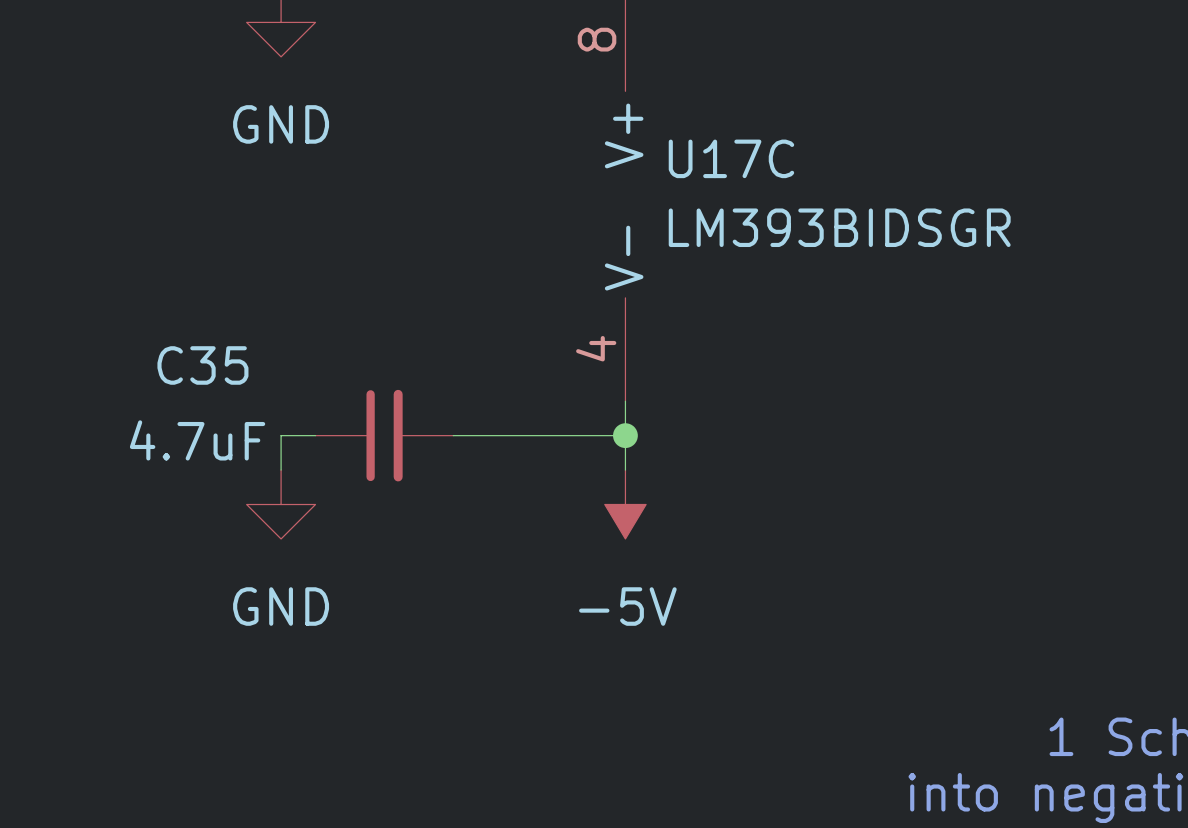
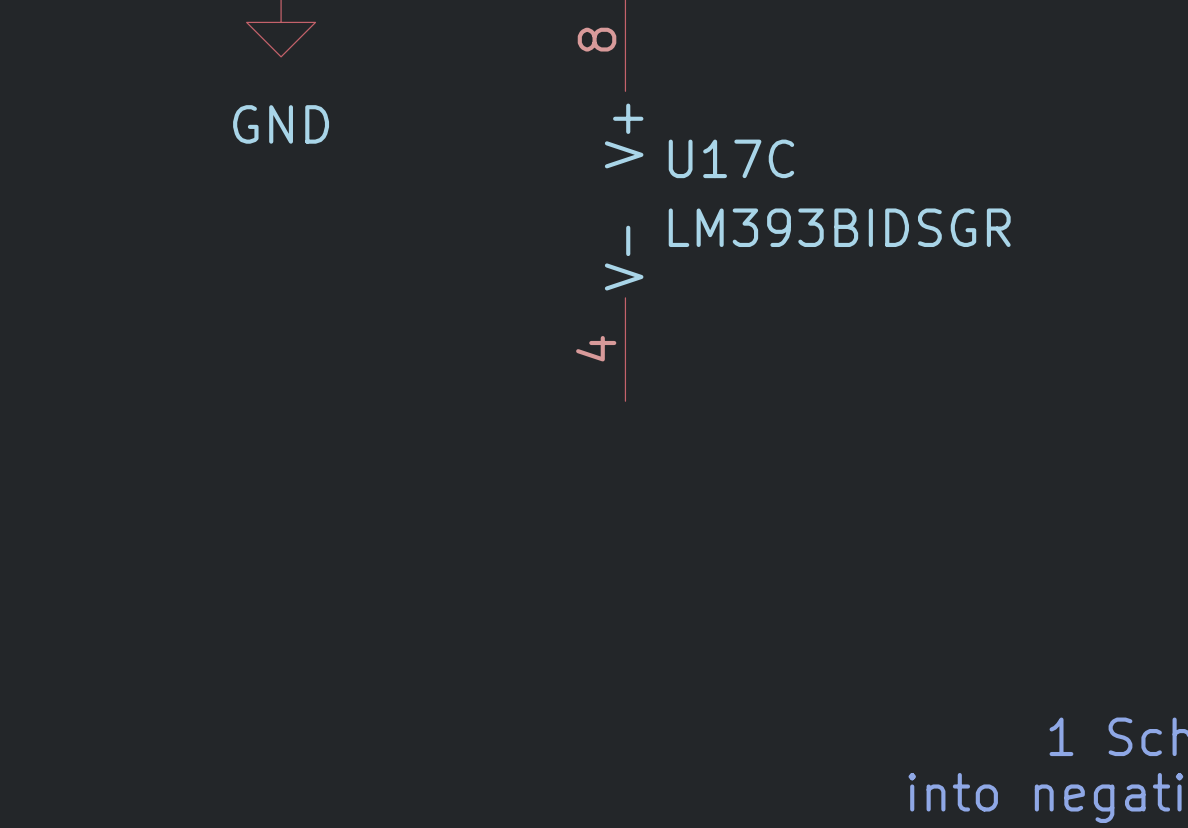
wire: (625, 401) (625, 470) -> none
wire: (315, 435) (281, 435) (281, 470) -> none
C35: 4.7uF (384, 435) -> none
wire: (453, 435) (625, 435) -> none
junction: (625, 435) -> none
power symbol: GND (281, 504) -> none
power symbol: -5V (625, 504) -> none

